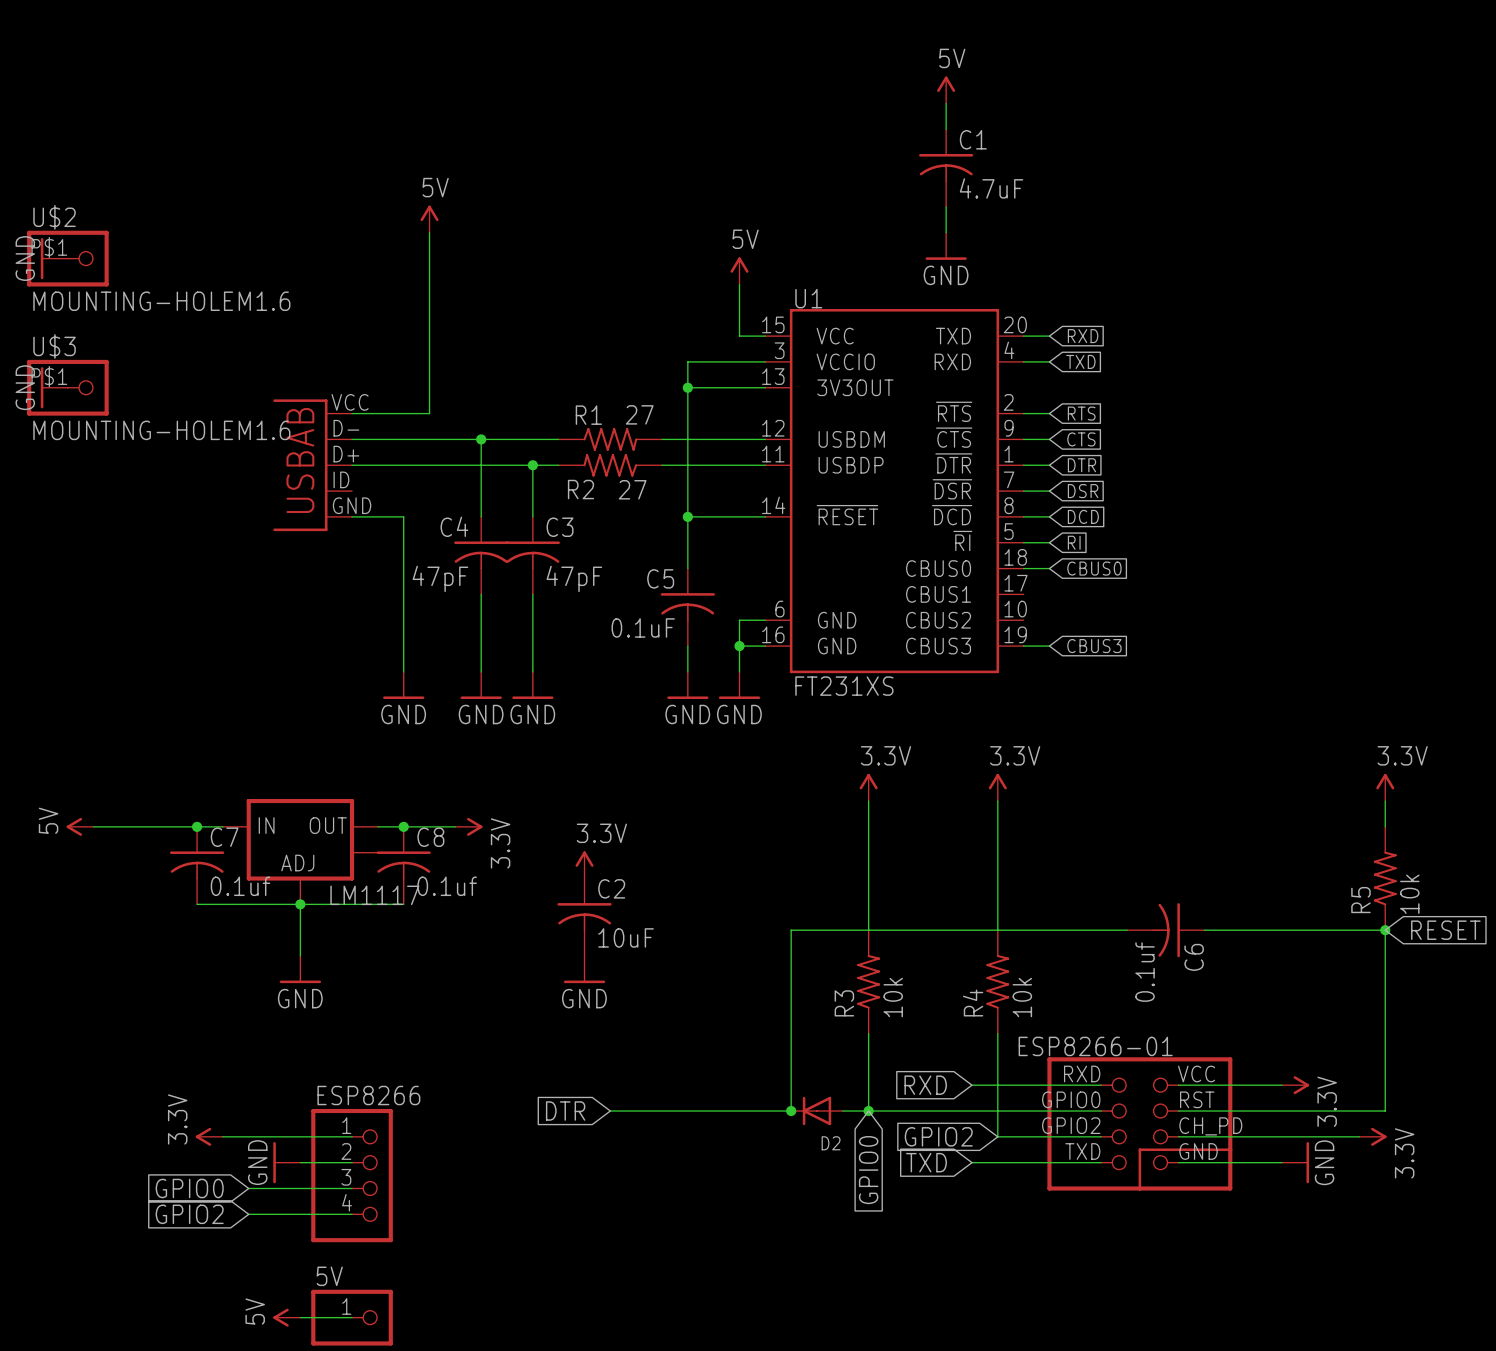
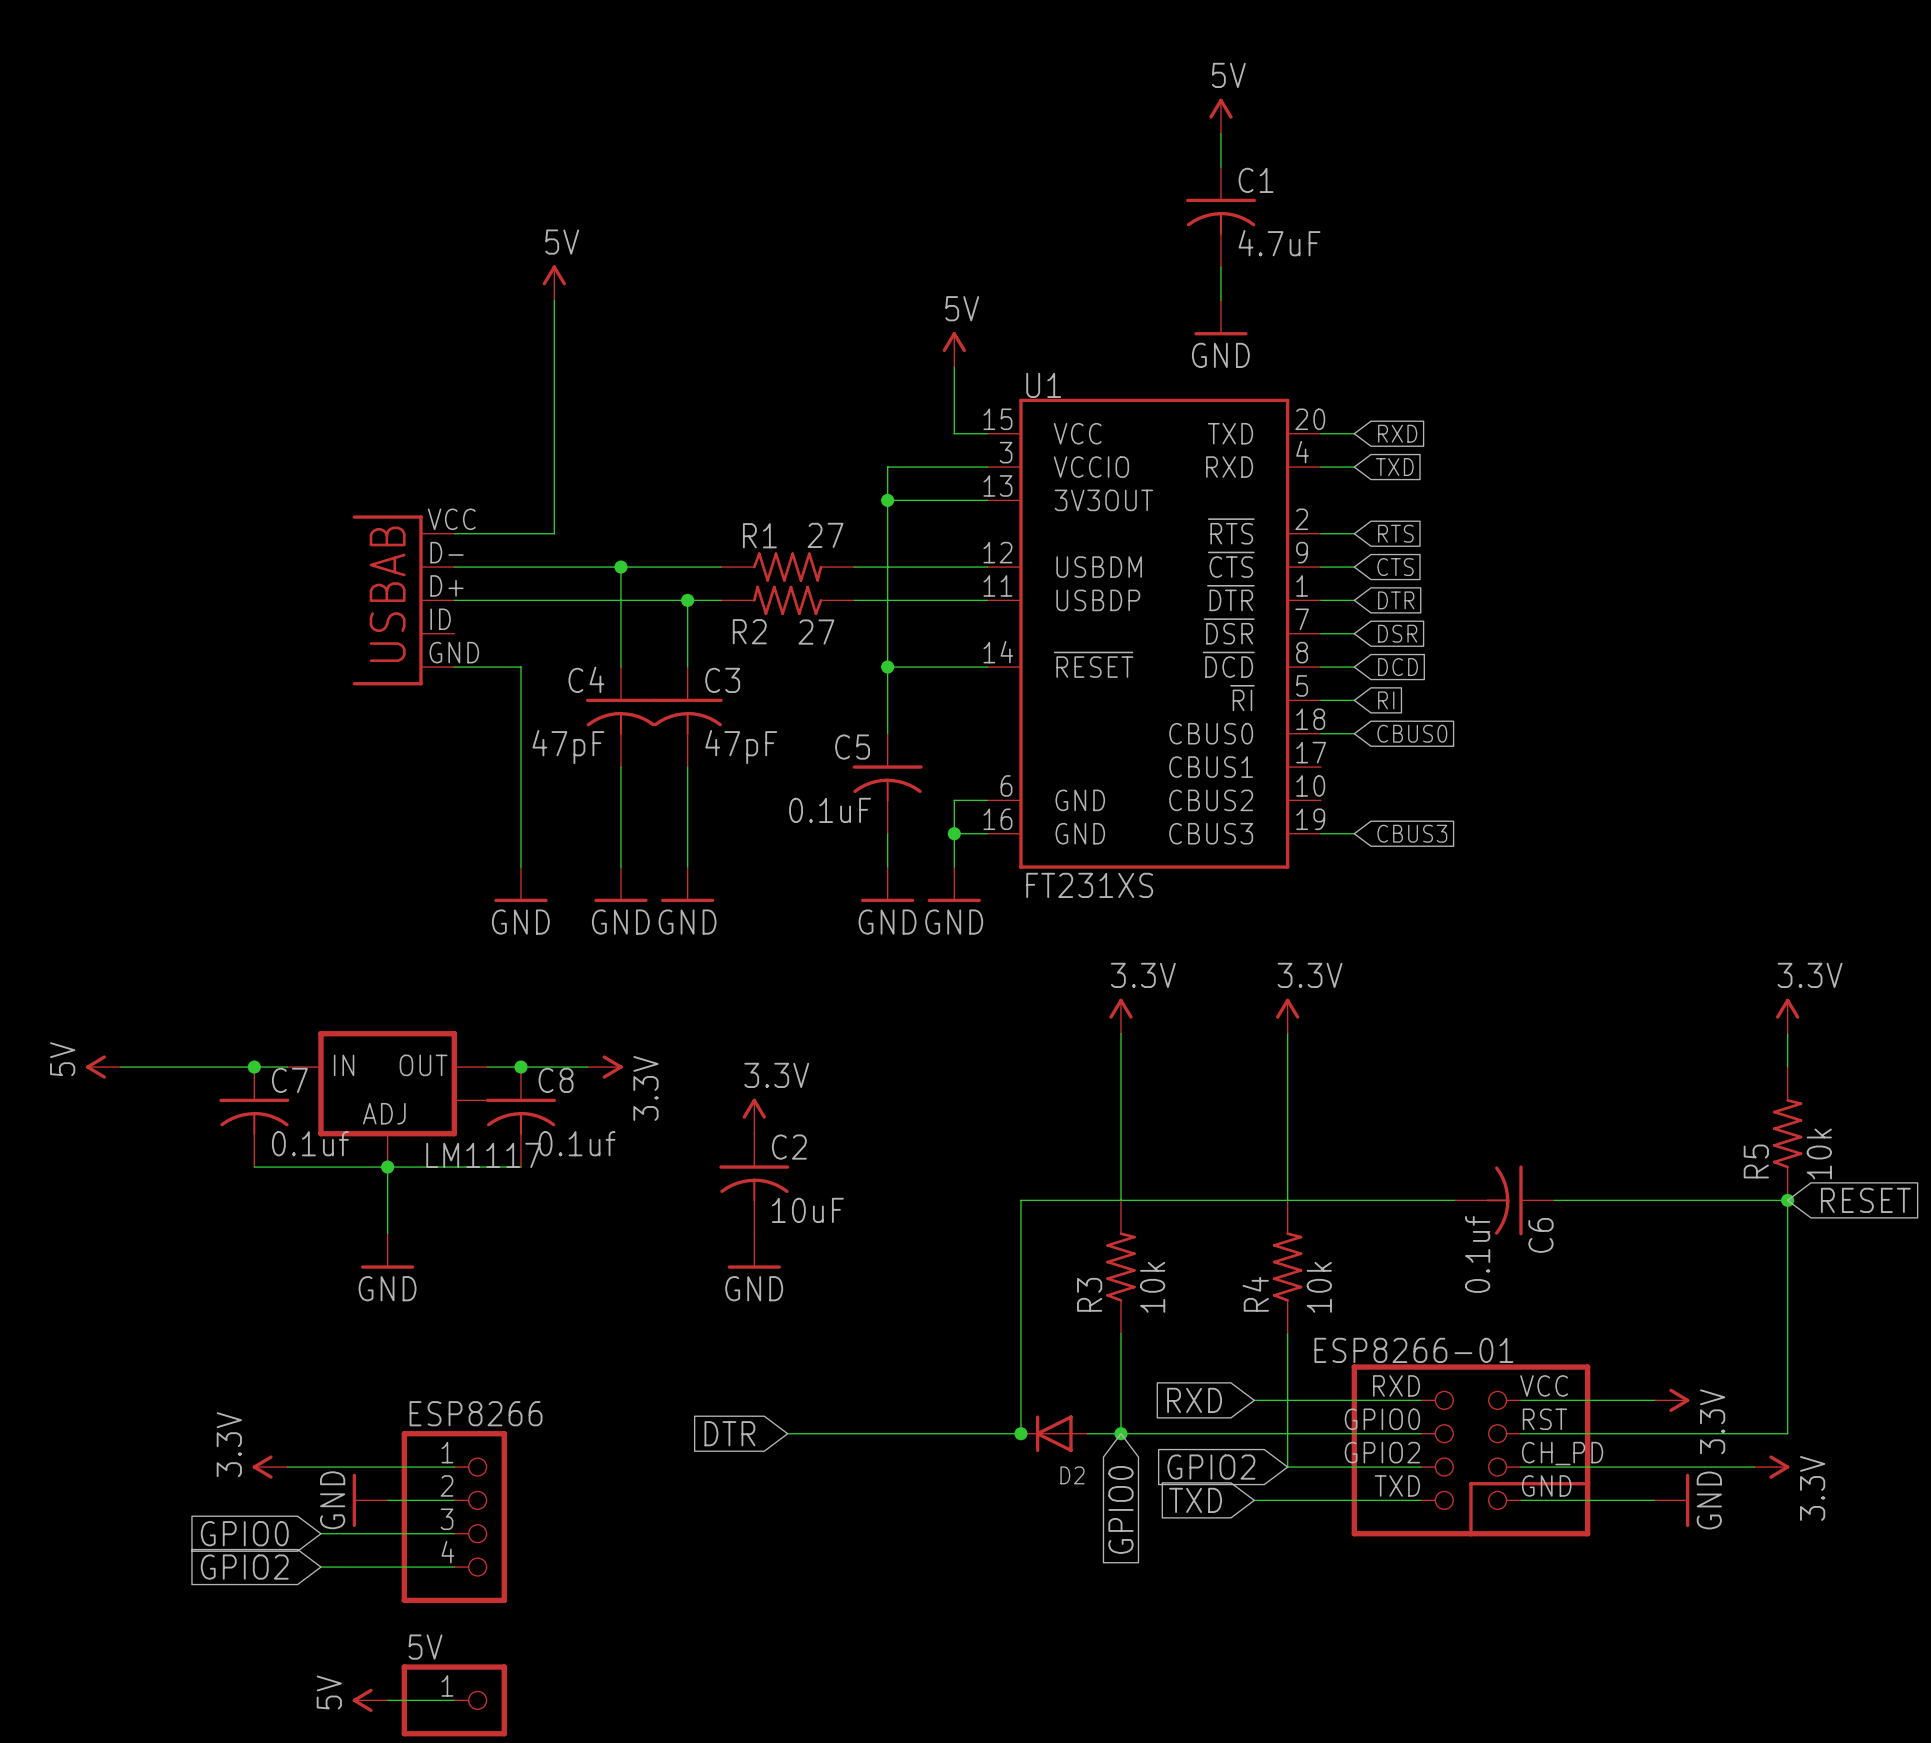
power symbol: GND (54, 258) -> none
U$2: MOUNTING-HOLEM1.6 (67, 258) -> none
power symbol: GND (54, 387) -> none
U$3: MOUNTING-HOLEM1.6 (67, 387) -> none

